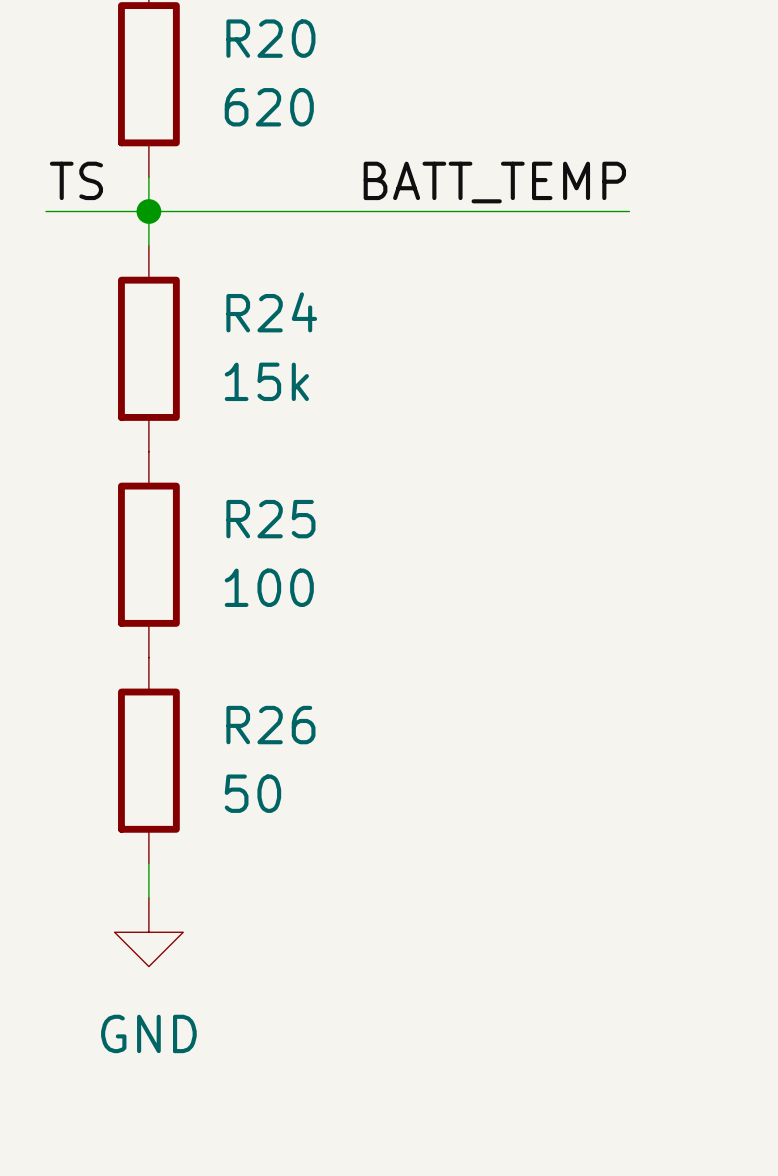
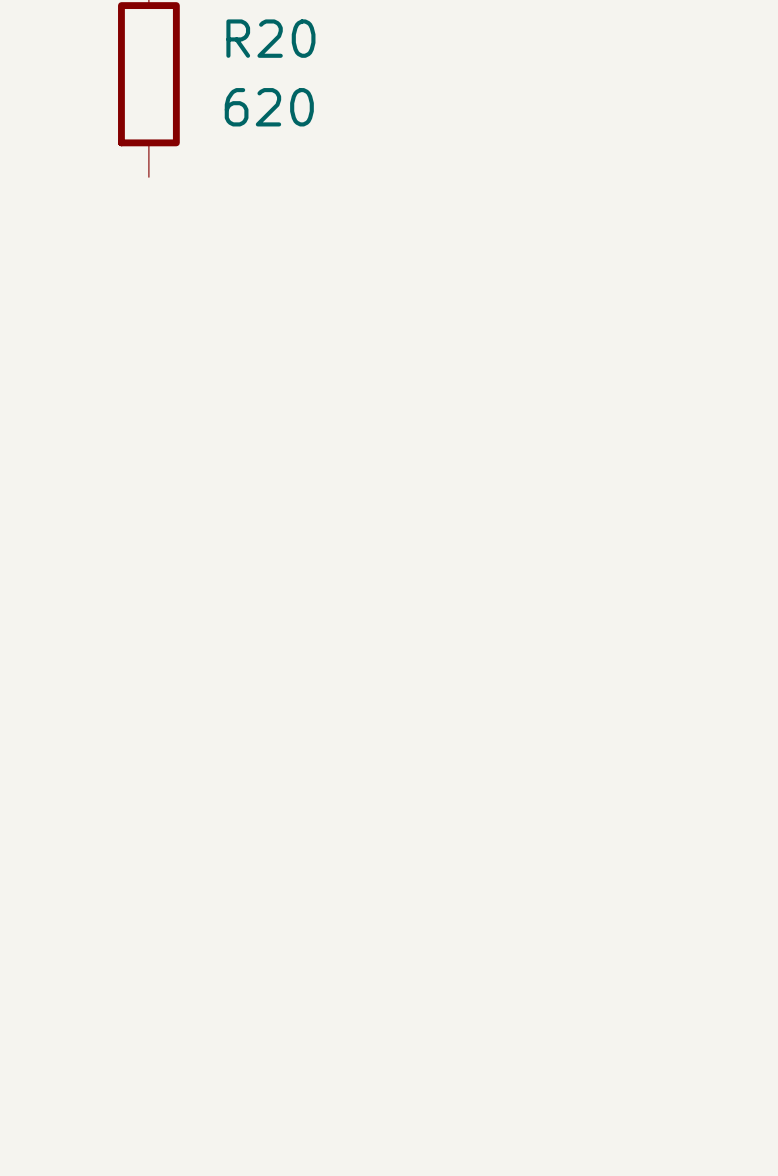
wire: (148, 177) (148, 245) -> none
label: TS (76, 180) -> none
label: BATT_TEMP (494, 182) -> none
wire: (45, 211) (629, 211) -> none
junction: (148, 211) -> none
R24: 15k (148, 348) -> none
R25: 100 (148, 554) -> none
R26: 50 (148, 760) -> none
wire: (148, 863) (148, 897) -> none
power symbol: GND (148, 932) -> none

